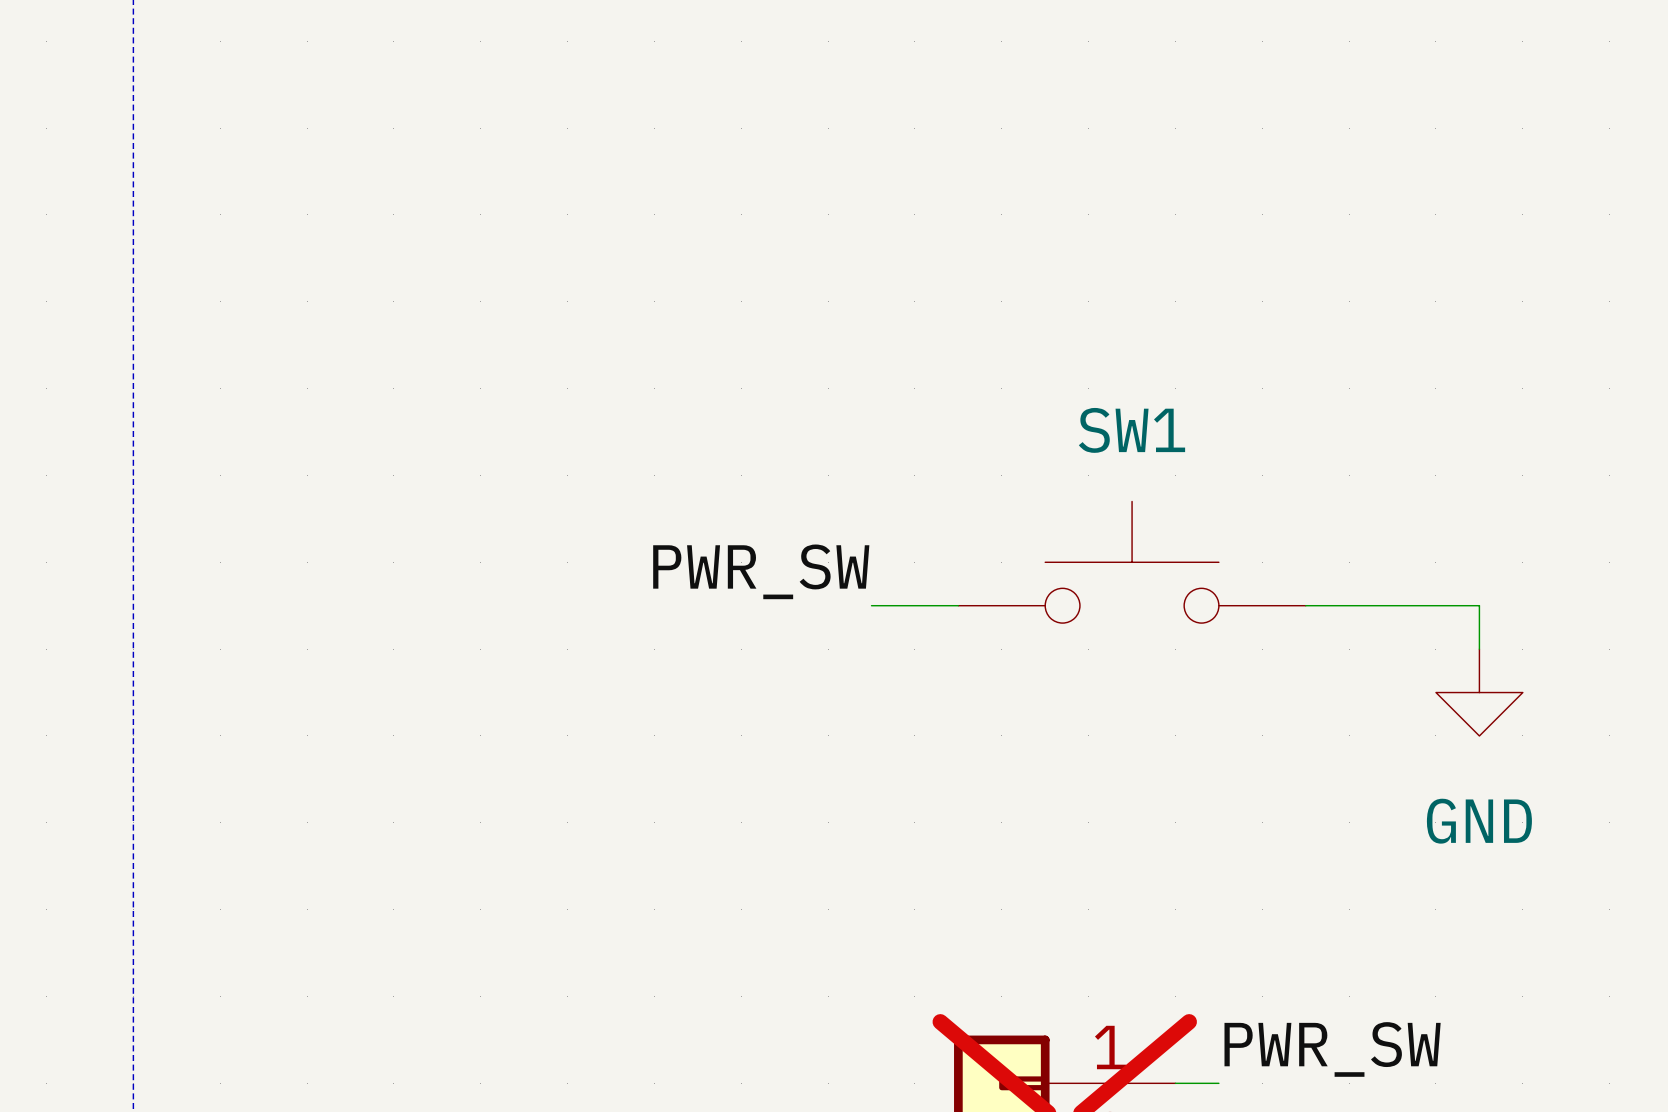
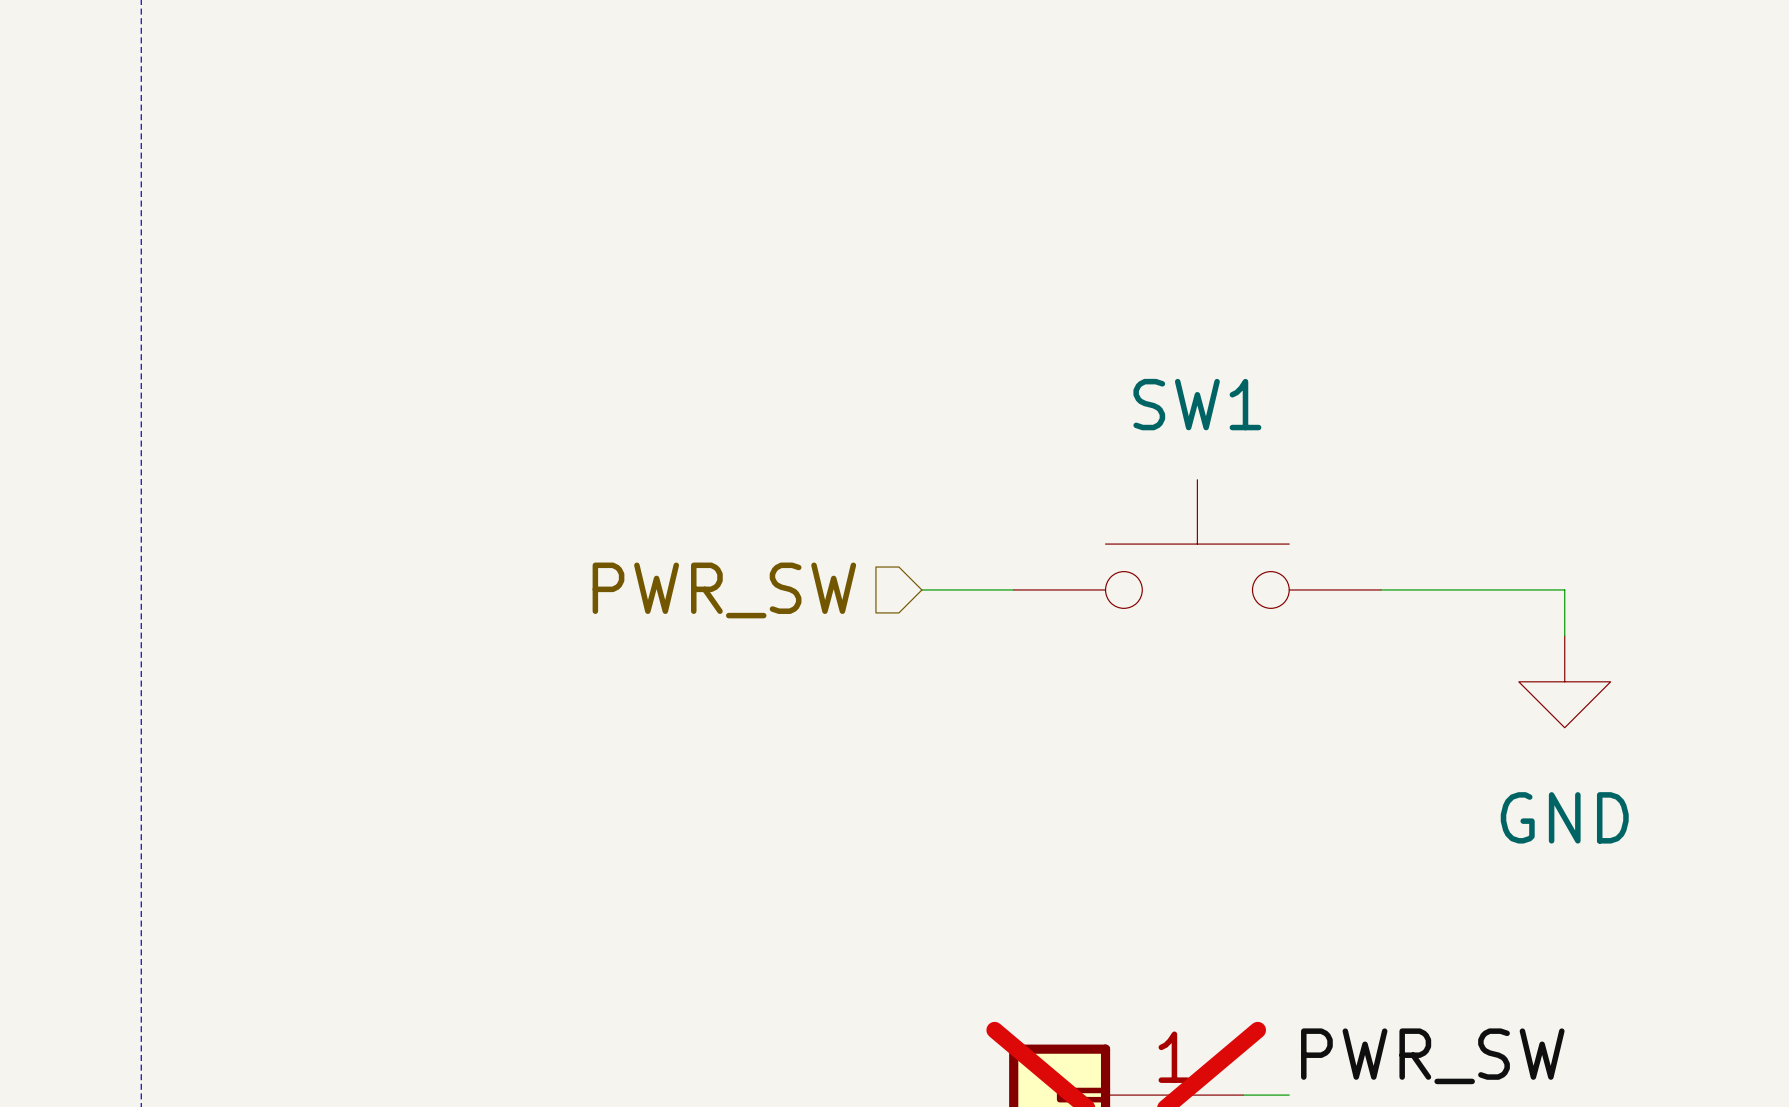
label: PWR_SW (761, 571) -> none
hierarchical label: none -> PWR_SW (724, 590)

